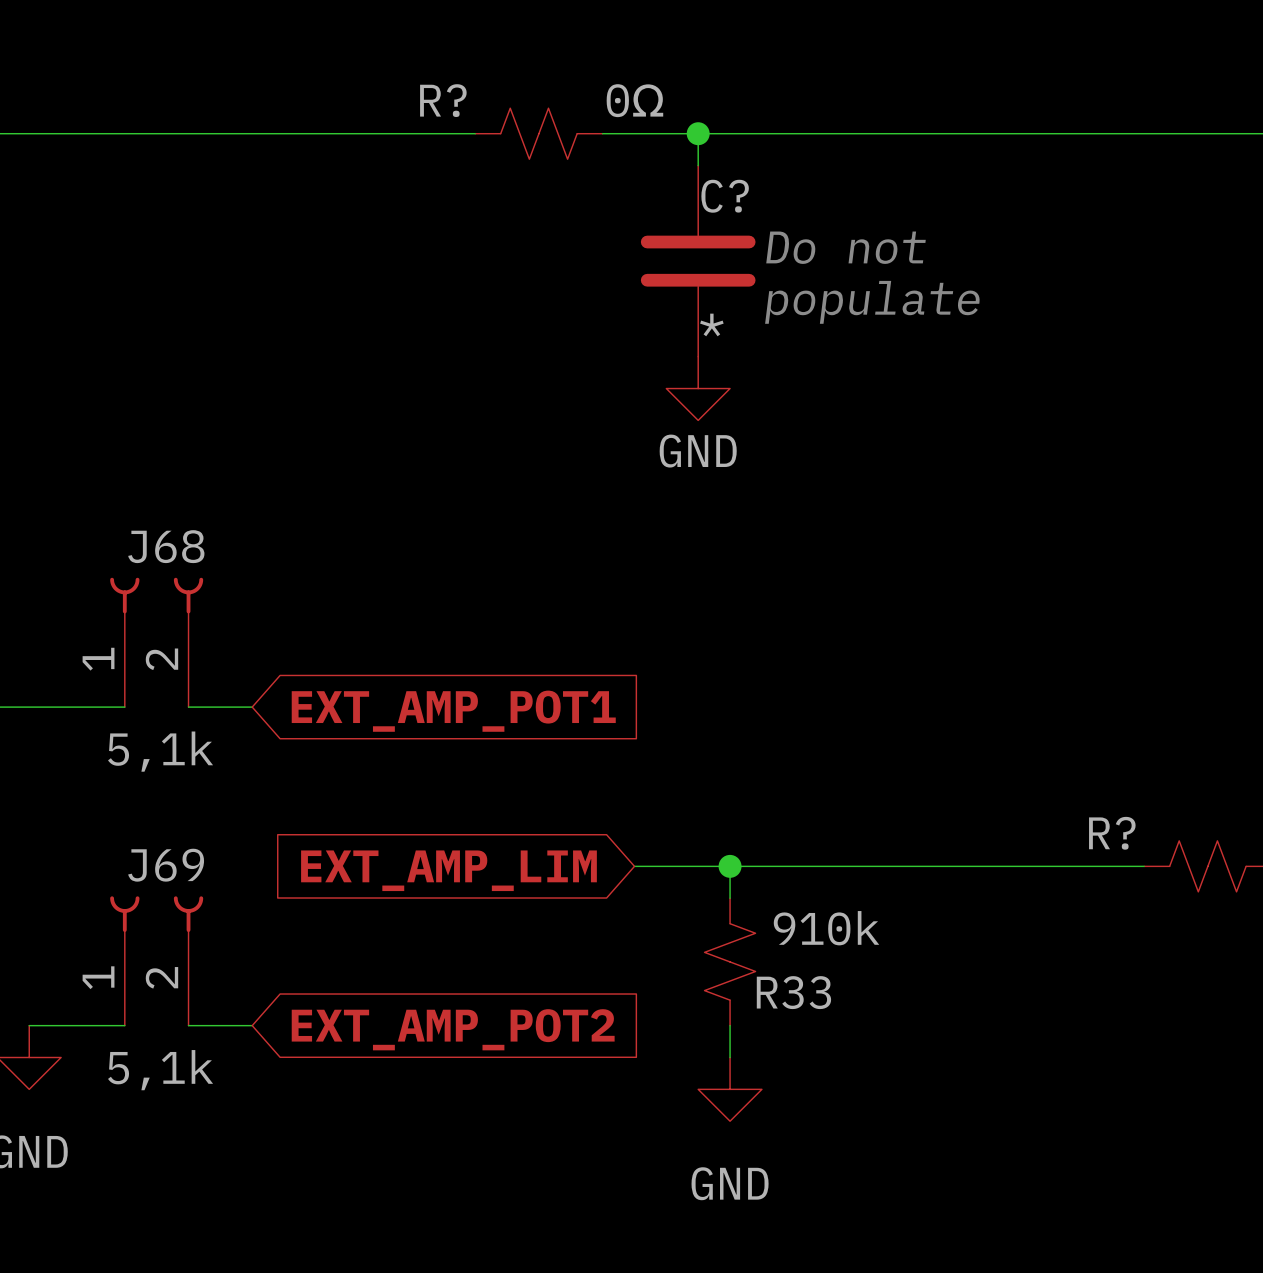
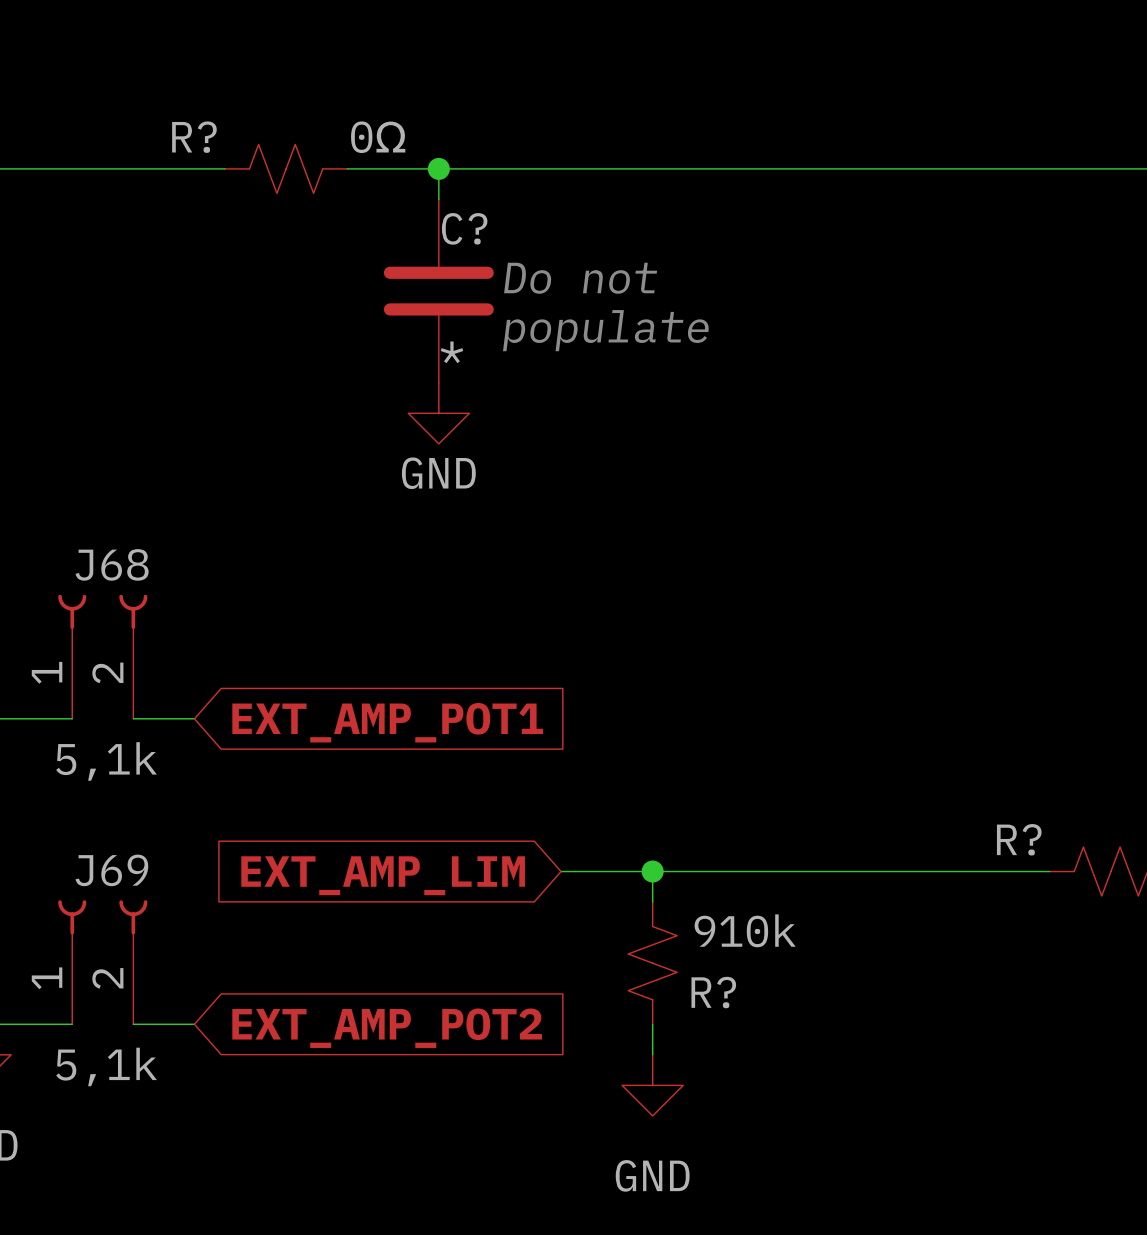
wire: (284, 133) (411, 133) -> (408, 168) (530, 168)
junction: none -> (438, 168)
R? position: (538, 133) -> (286, 168)
wire: (698, 133) (698, 165) -> (438, 168) (438, 199)
junction: (698, 133) -> none
text position: Do not (846, 247) -> Do not (580, 278)
C? position: (698, 261) -> (438, 291)
text position: populate (872, 302) -> populate (605, 330)
power symbol position: GND (698, 388) -> GND (438, 413)
R33 name: R33 (793, 992) -> R? (713, 992)

